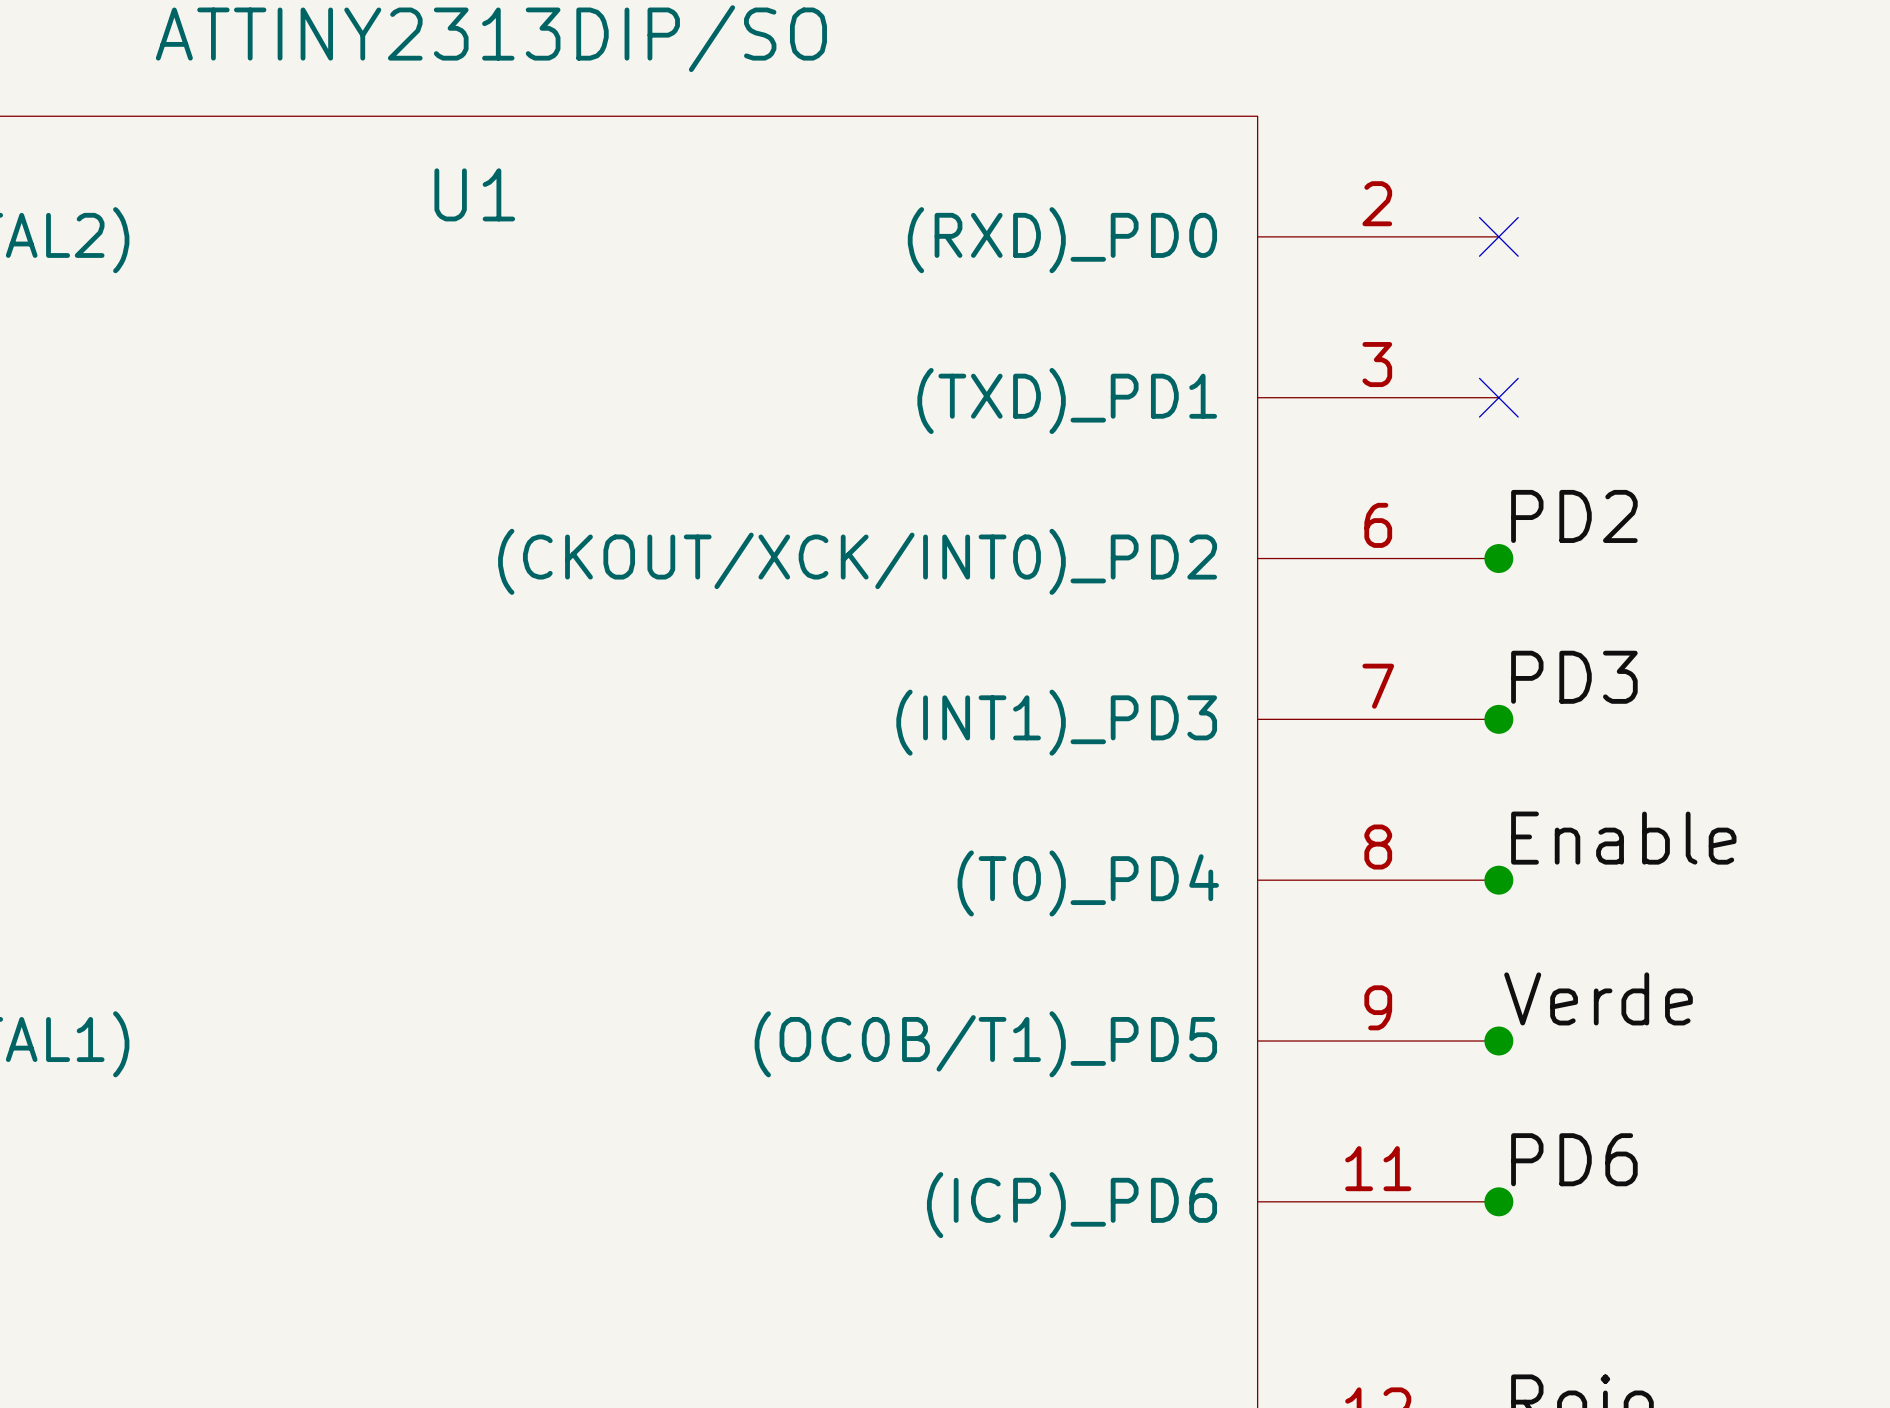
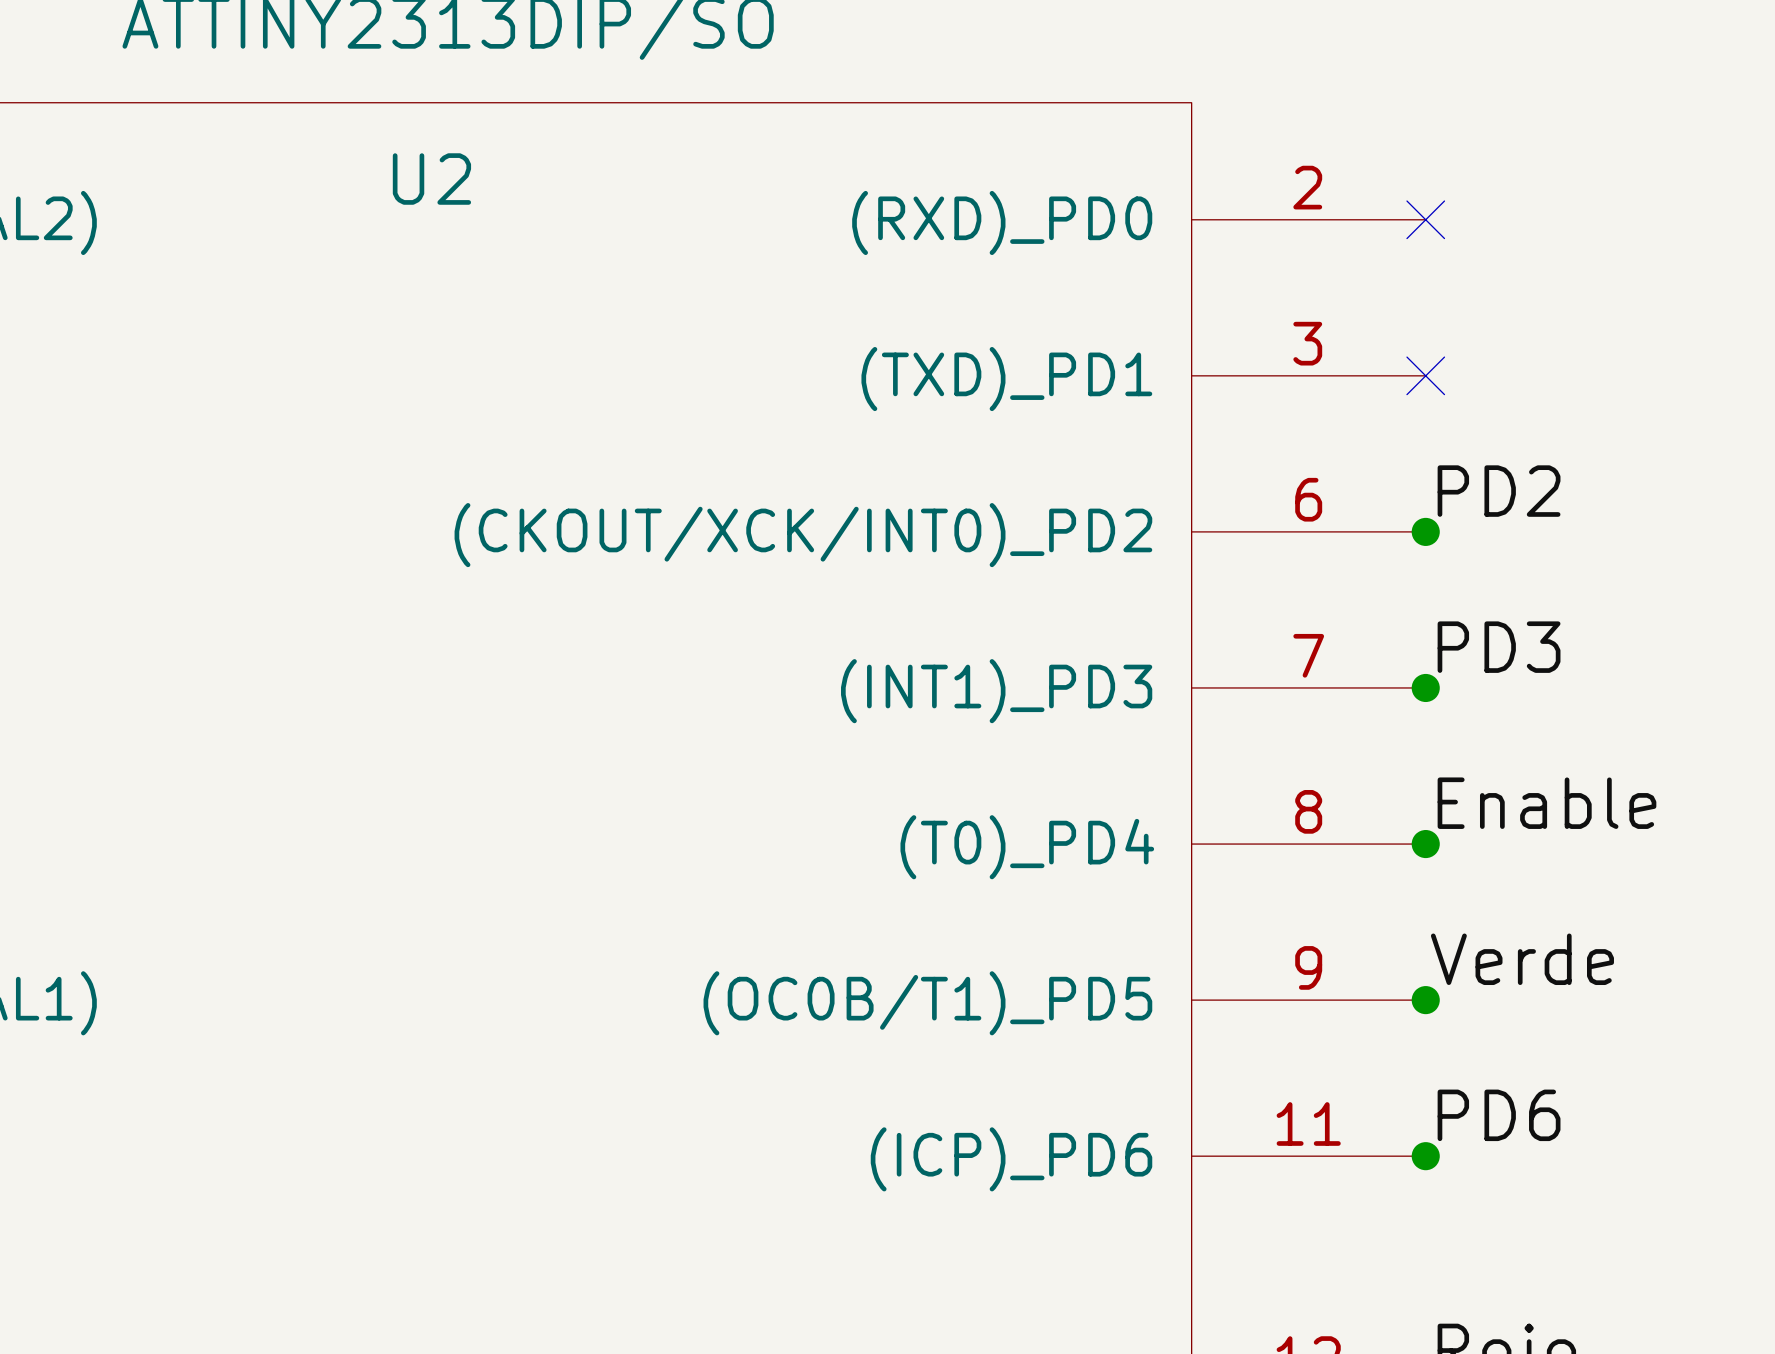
U1 name: U1 (474, 194) -> U2 (431, 179)

